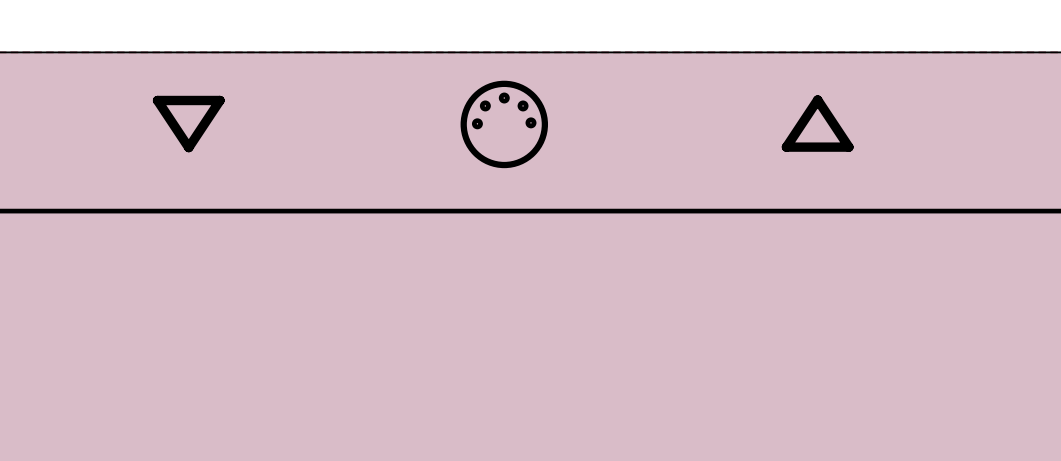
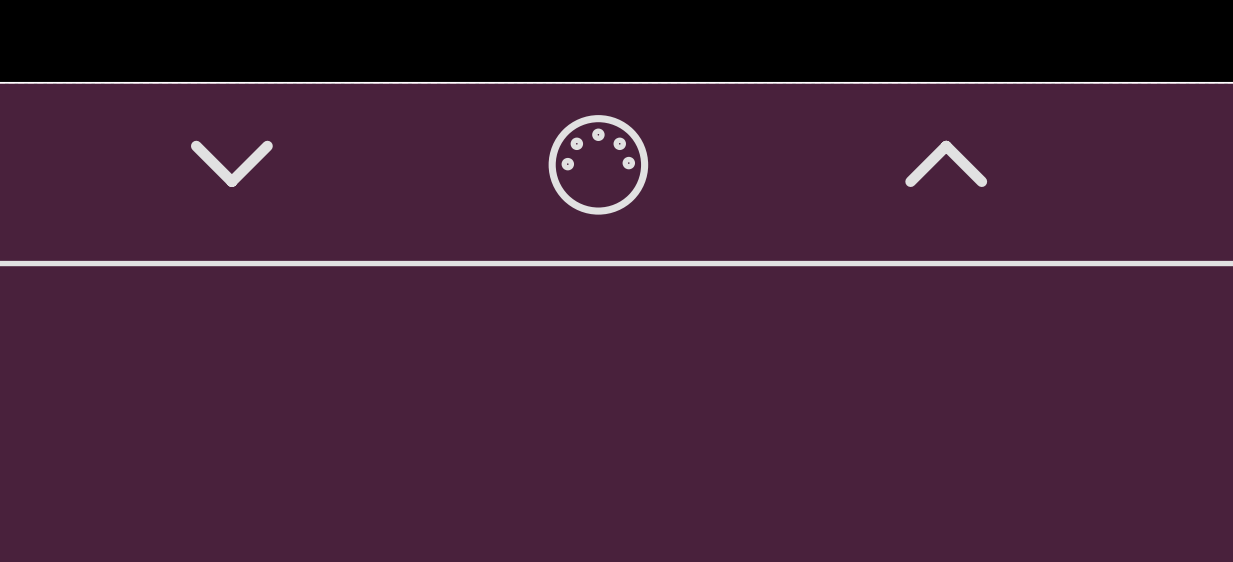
line: (157, 100) (220, 100) (188, 147) (157, 100) -> none
line: (817, 100) (786, 147) (848, 147) (817, 100) -> none
line: none -> (196, 146) (231, 181) (267, 146)
line: none -> (910, 181) (946, 146) (981, 181)

